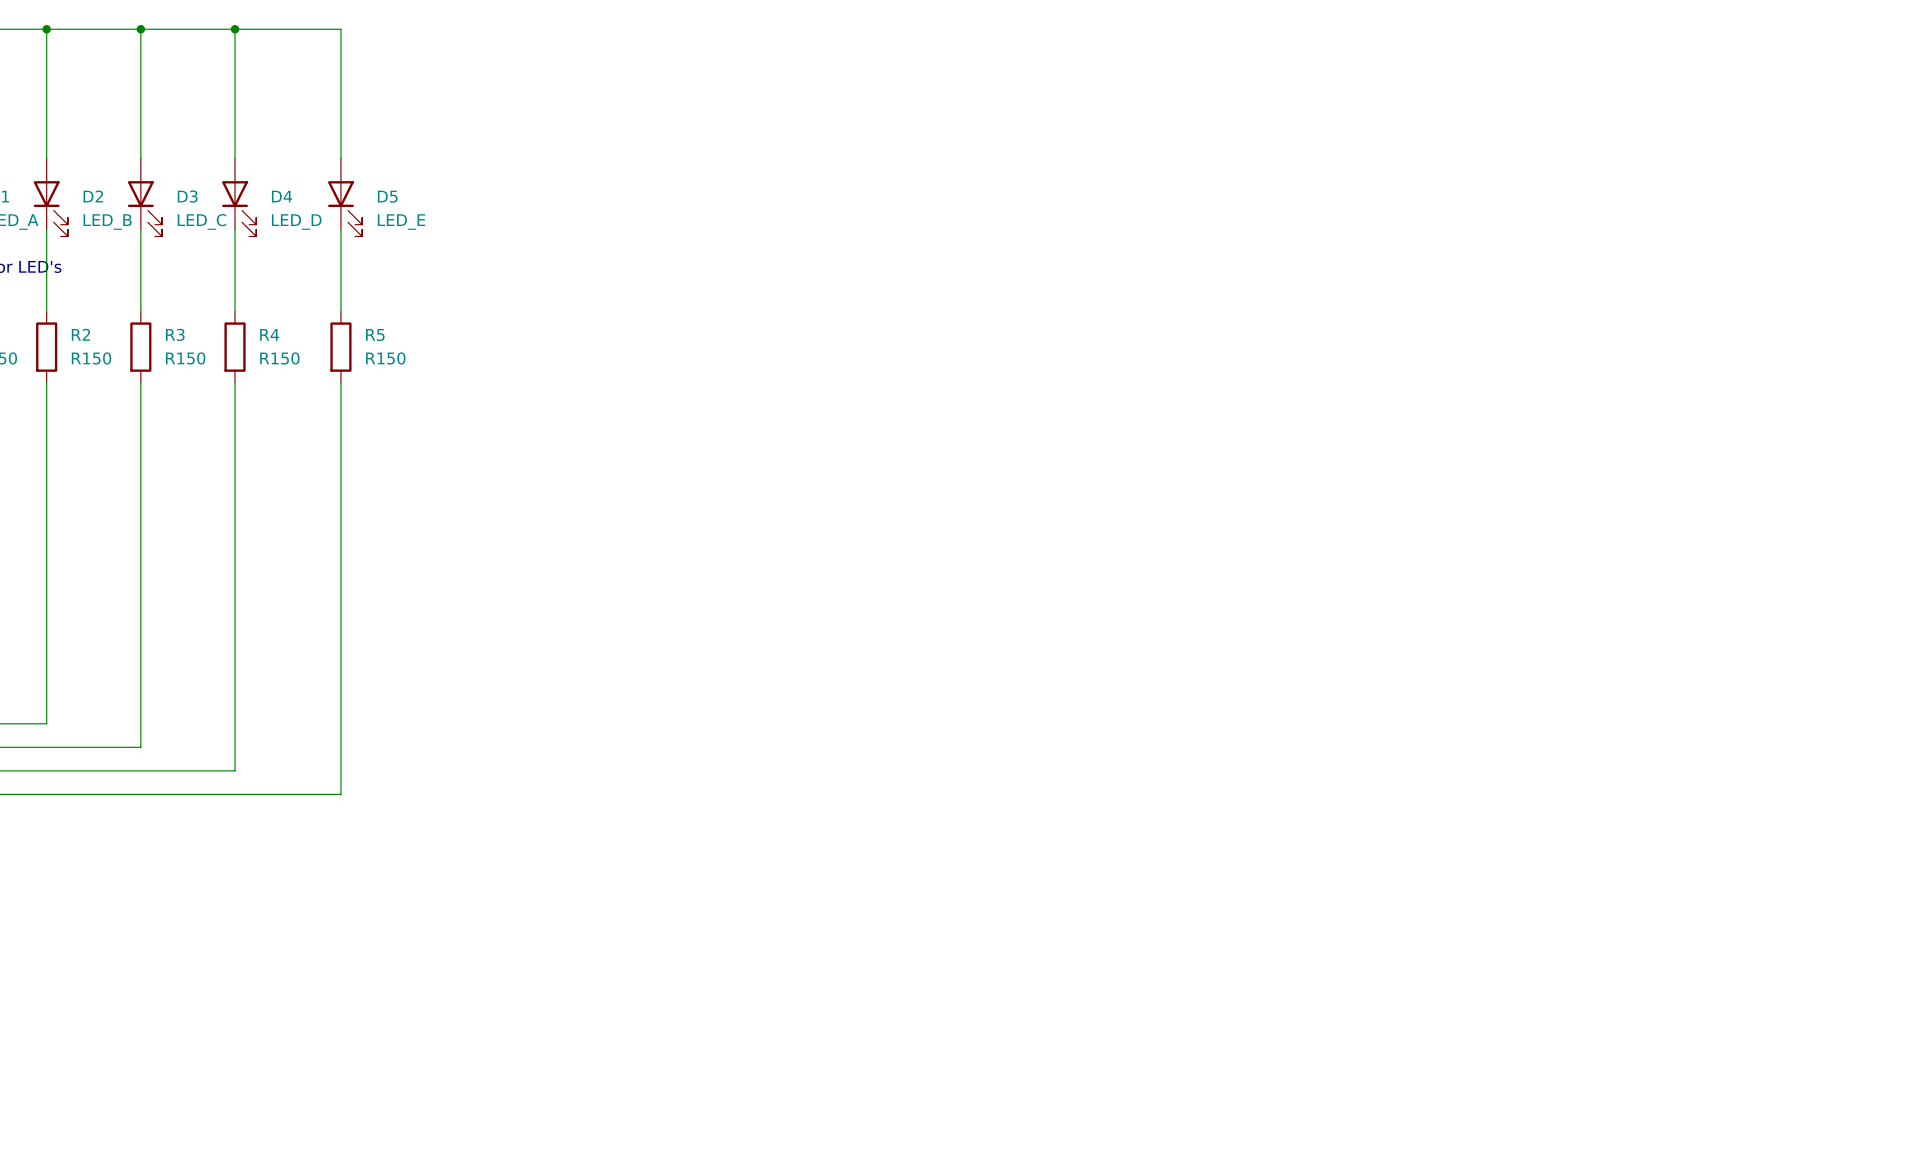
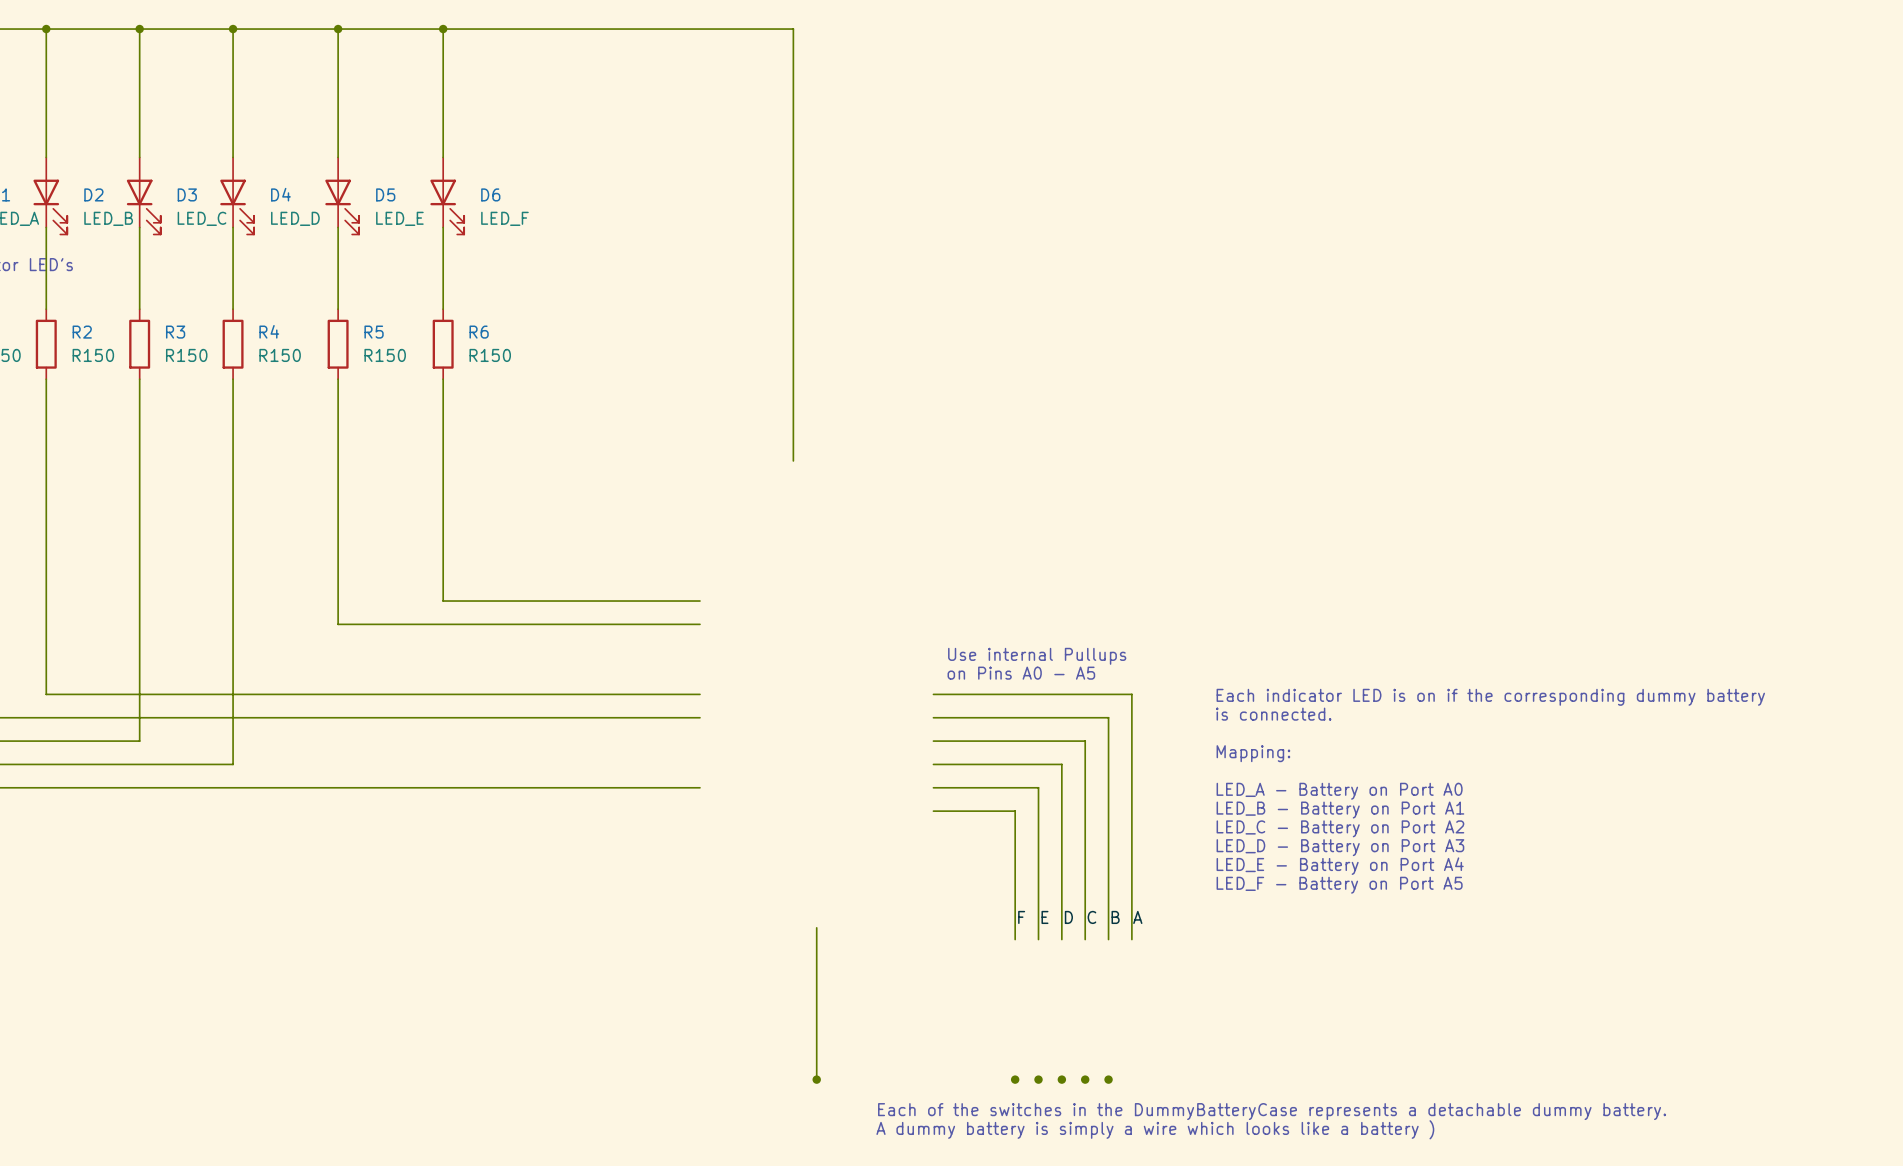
wire: none -> (338, 29) (793, 29) (793, 460)
junction: none -> (338, 29)
wire: none -> (443, 29) (443, 157)
junction: none -> (443, 29)
D6: none -> LED_F (447, 195)
wire: none -> (443, 227) (443, 309)
R6: none -> R150 (443, 344)
wire: none -> (443, 379) (443, 601) (699, 601)
wire: (340, 629) (340, 794) -> (338, 624) (699, 624)
text: none -> Use internal Pullups (1037, 656)
text: none -> on Pins A0 - A5 (1021, 673)
wire: (46, 700) (46, 723) -> (46, 694) (699, 694)
wire: none -> (933, 694) (1131, 694) (1131, 939)
text: none -> Each indicator LED is on if the corresponding dummy battery (1490, 697)
text: none -> is connected. (1273, 714)
wire: none -> (46, 717) (699, 717)
wire: none -> (933, 717) (1108, 717) (1108, 939)
wire: none -> (933, 741) (1085, 741) (1085, 939)
text: none -> Mapping: (1253, 753)
wire: none -> (933, 764) (1061, 764) (1061, 939)
wire: none -> (338, 787) (699, 787)
wire: none -> (933, 787) (1038, 787) (1038, 939)
text: none -> LED_A - Battery on Port A0 (1339, 791)
text: none -> LED_B - Battery on Port A1 (1340, 810)
wire: none -> (933, 811) (1015, 811) (1015, 939)
text: none -> LED_C - Battery on Port A2 (1340, 828)
text: none -> LED_D - Battery on Port A3 (1340, 847)
text: none -> LED_E - Battery on Port A4 (1340, 866)
text: none -> LED_F - Battery on Port A5 (1339, 885)
label: none -> F (1021, 917)
label: none -> E (1044, 917)
label: none -> D (1068, 917)
label: none -> C (1091, 917)
label: none -> B (1115, 917)
label: none -> A (1137, 917)
wire: none -> (816, 927) (816, 1079)
junction: none -> (816, 1079)
junction: none -> (1015, 1079)
junction: none -> (1038, 1079)
junction: none -> (1061, 1079)
junction: none -> (1085, 1079)
junction: none -> (1108, 1079)
text: none -> Each of the switches in the DummyBatteryCase represents a detachable dummy battery. (1272, 1111)
text: none -> A dummy battery is simply a wire which looks like a battery ) (1155, 1129)

